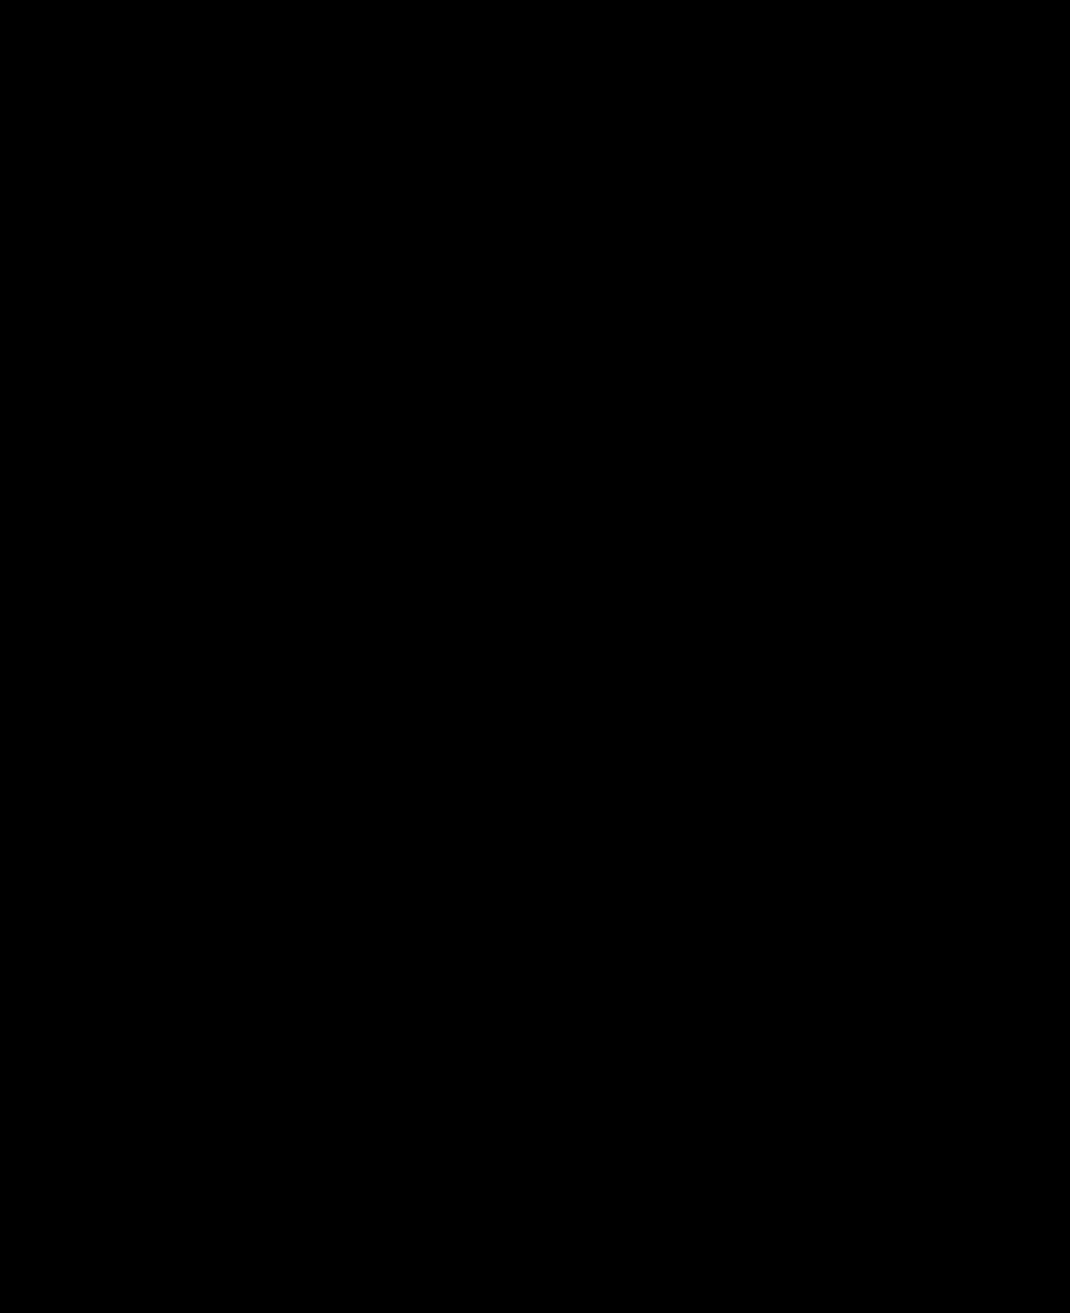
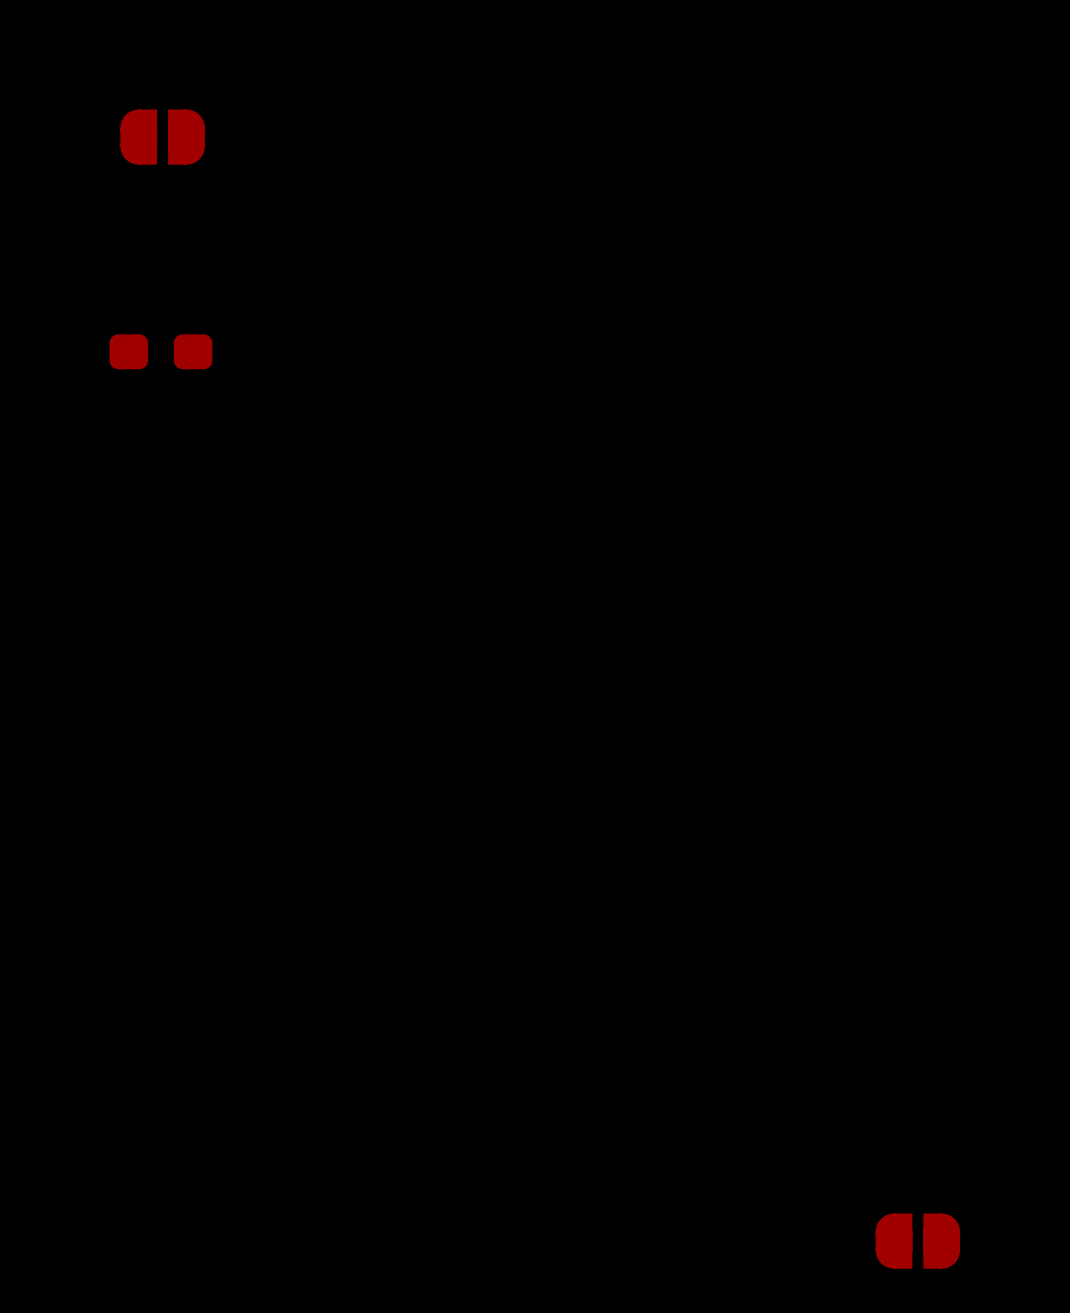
part: none -> (162, 137)
part: none -> (160, 351)
part: none -> (917, 1241)

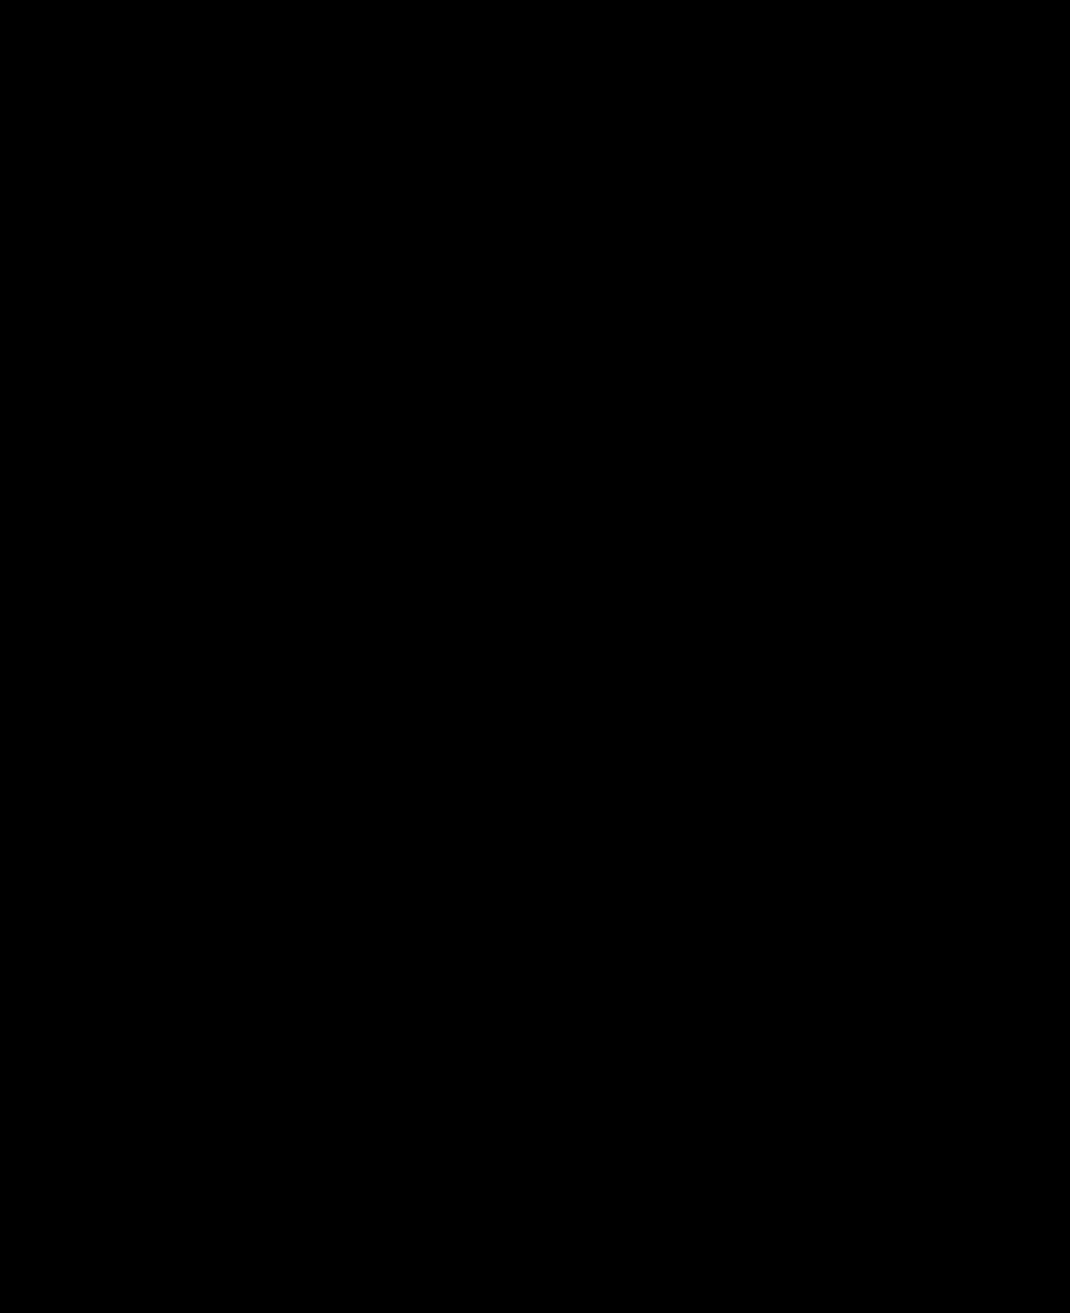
part: (162, 137) -> none
part: (160, 351) -> none
part: (917, 1241) -> none

